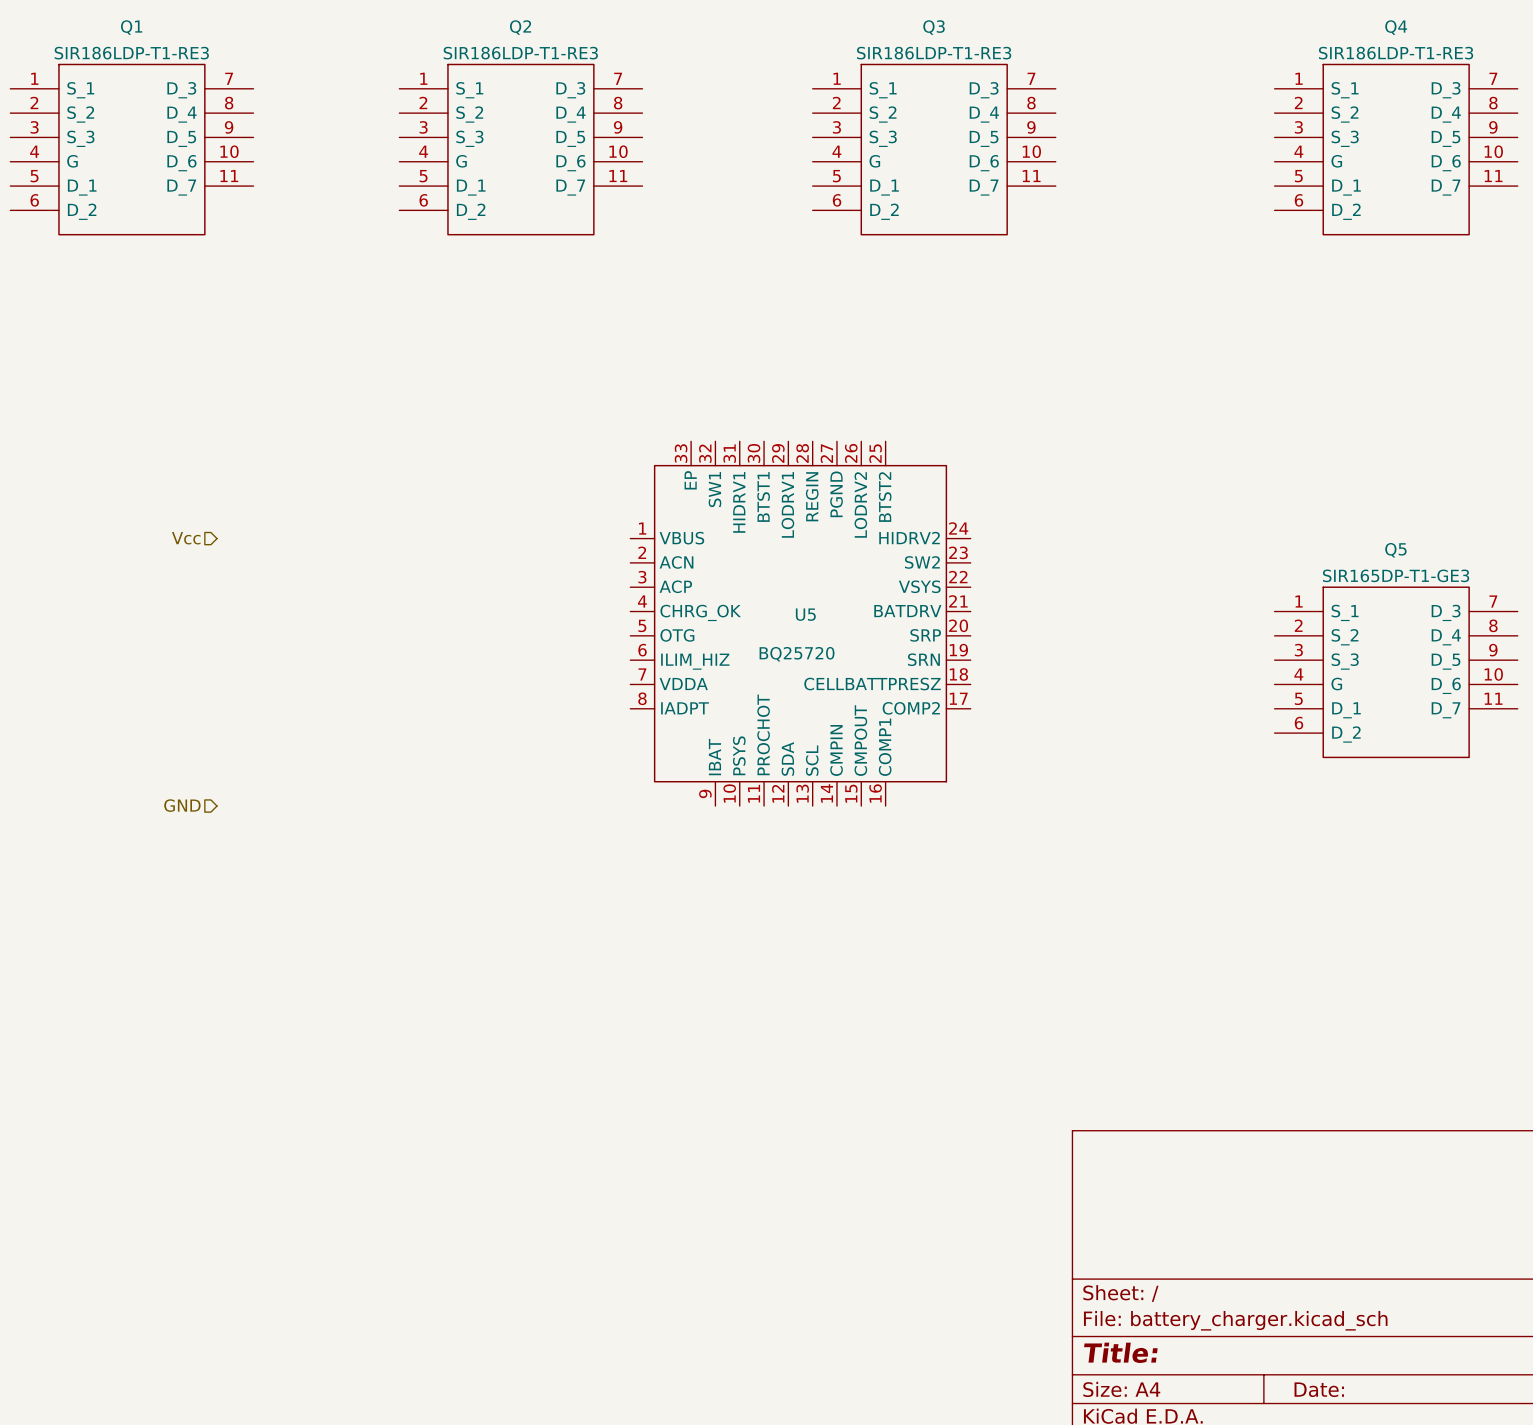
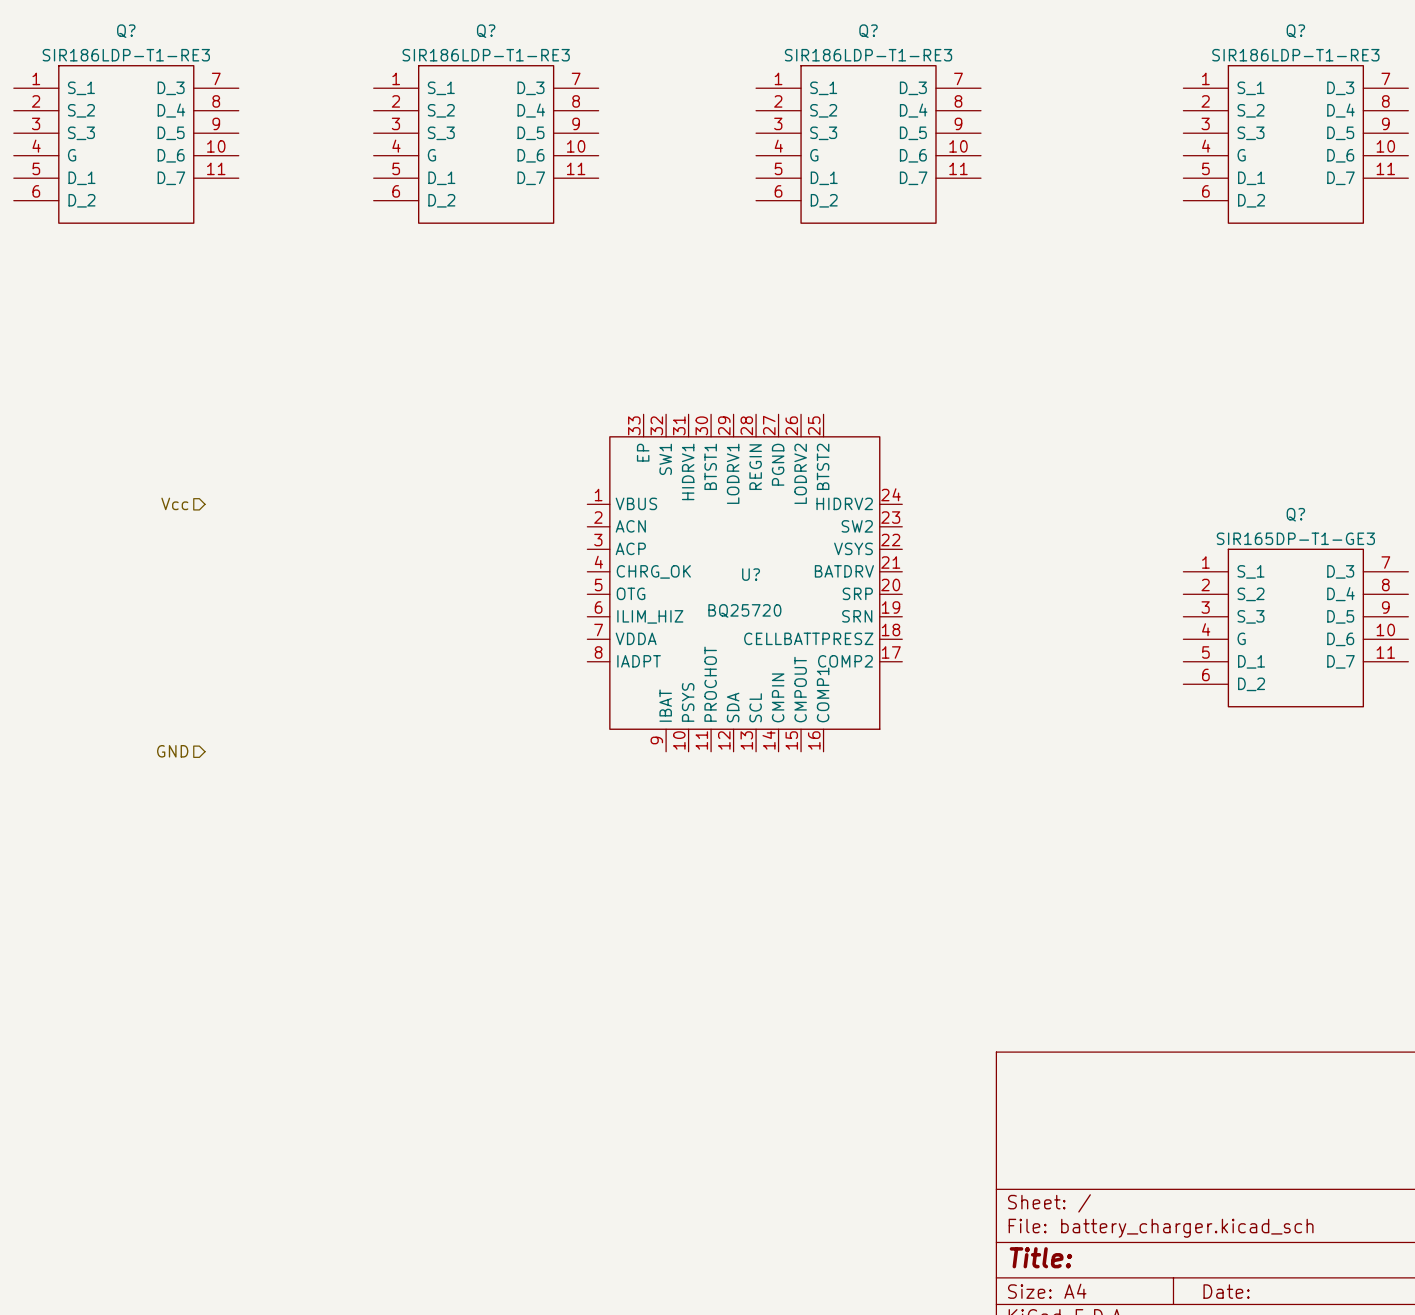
Q1 name: Q1 (131, 27) -> Q? (126, 31)
Q2 name: Q2 (520, 27) -> Q? (486, 31)
Q3 name: Q3 (934, 27) -> Q? (868, 31)
Q4 name: Q4 (1396, 27) -> Q? (1295, 31)
Q5 name: Q5 (1395, 550) -> Q? (1295, 514)
U5 name: U5 (805, 614) -> U? (751, 574)

